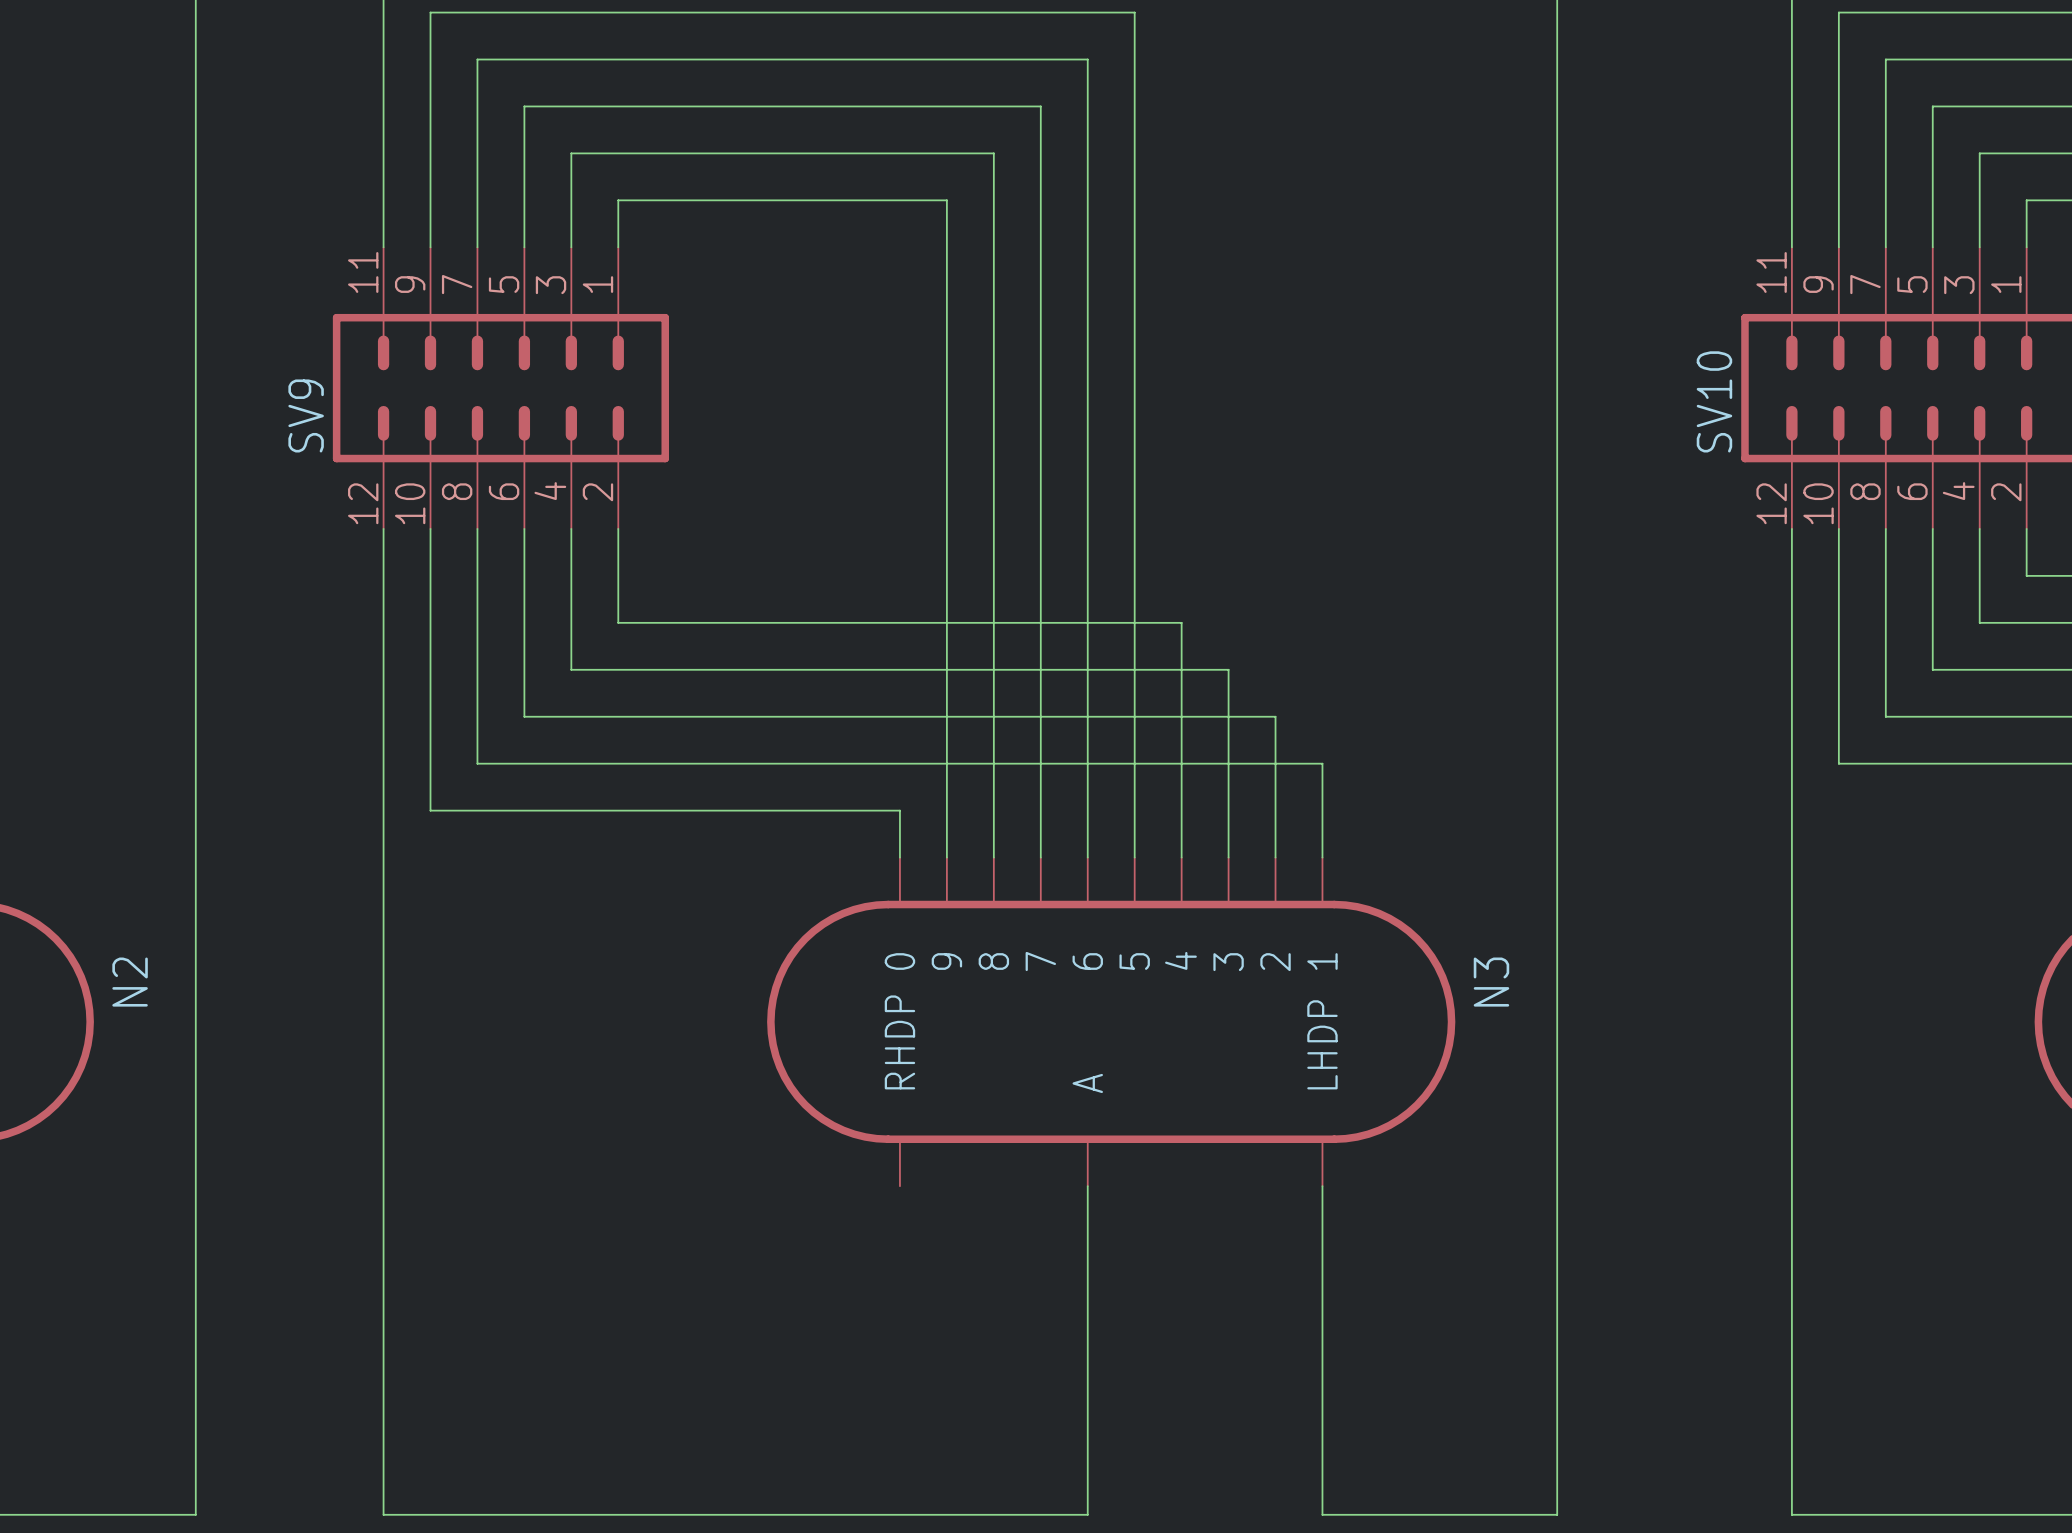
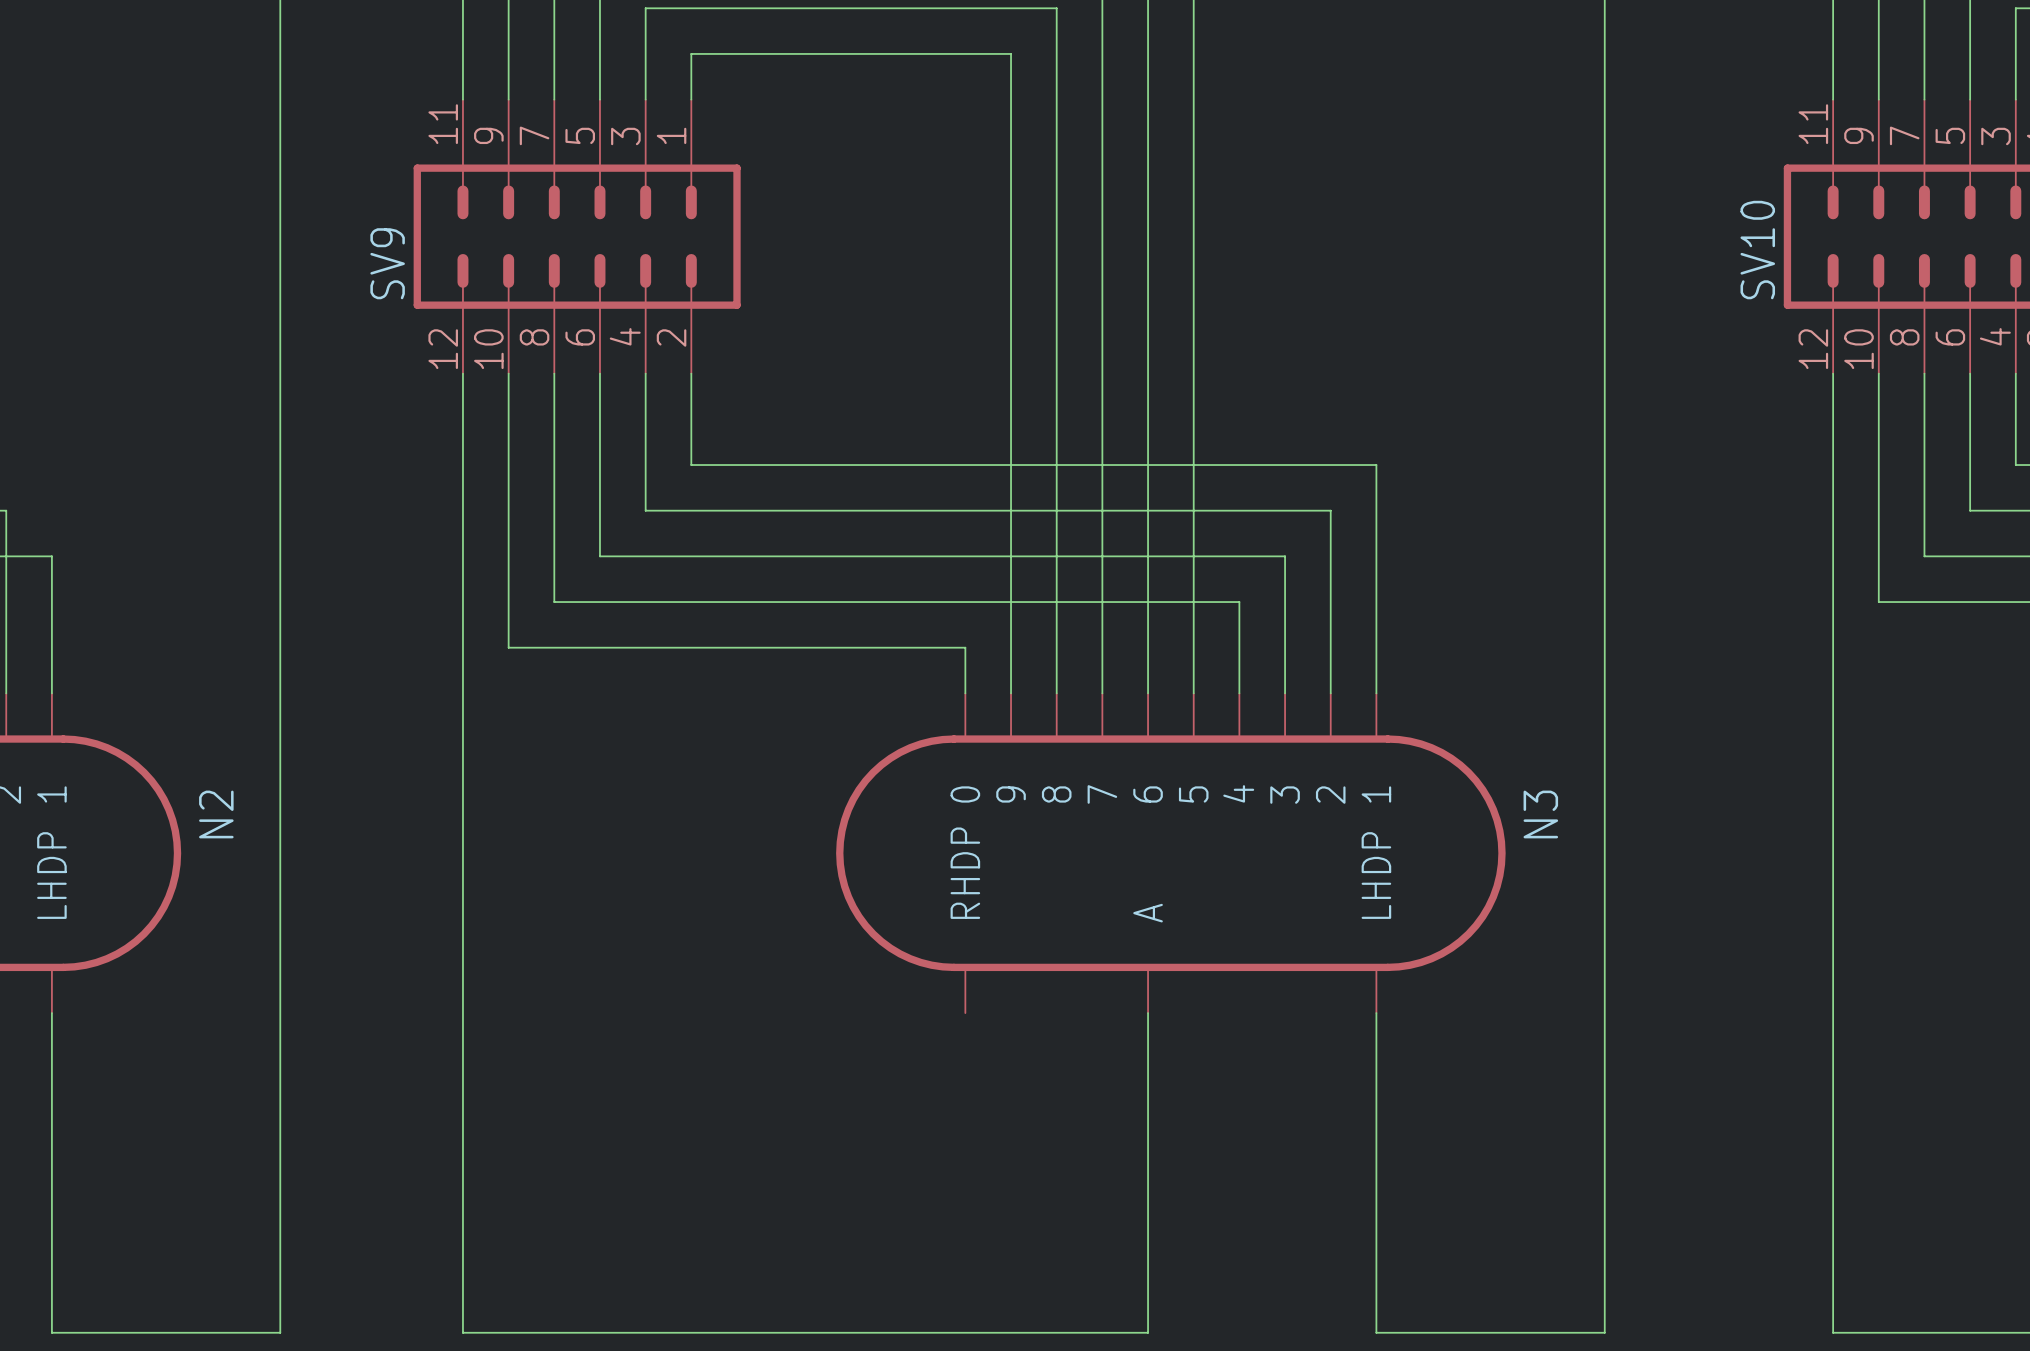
wire: (1181, 622) (1181, 763) (1322, 763) -> (1239, 465) (1376, 465) (1376, 602)
wire: (1228, 669) (1228, 716) (1275, 716) -> (1285, 510) (1330, 510) (1330, 556)

